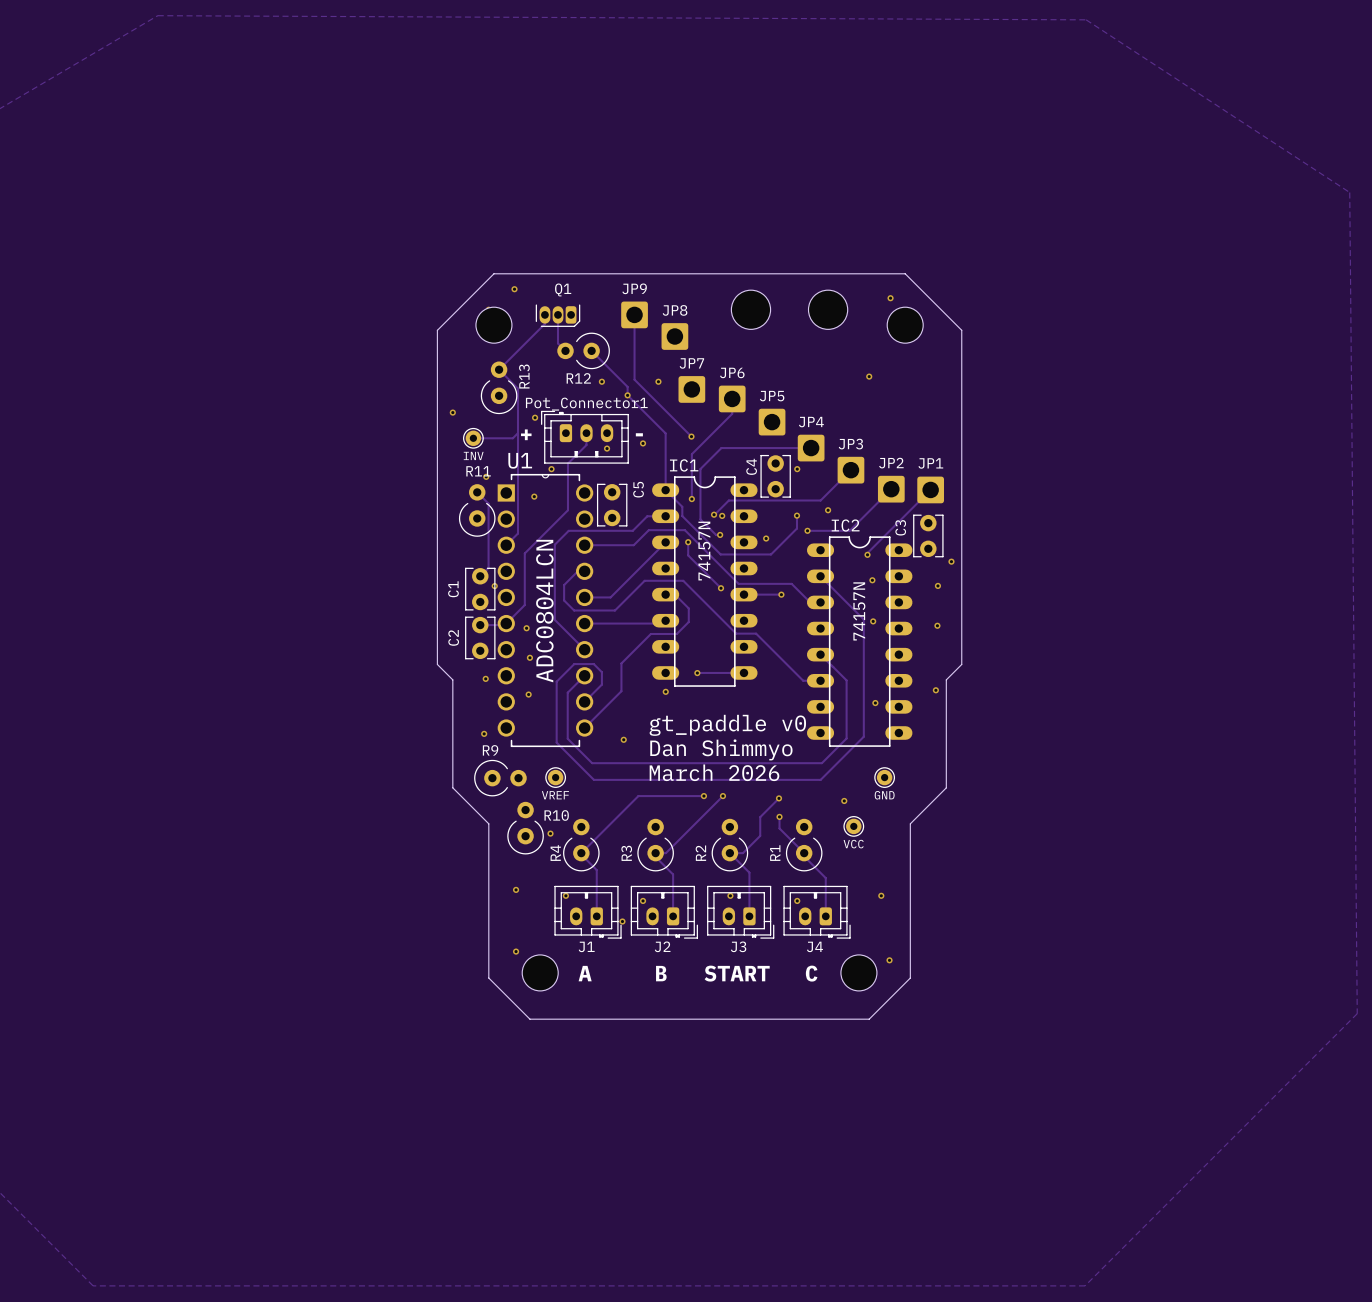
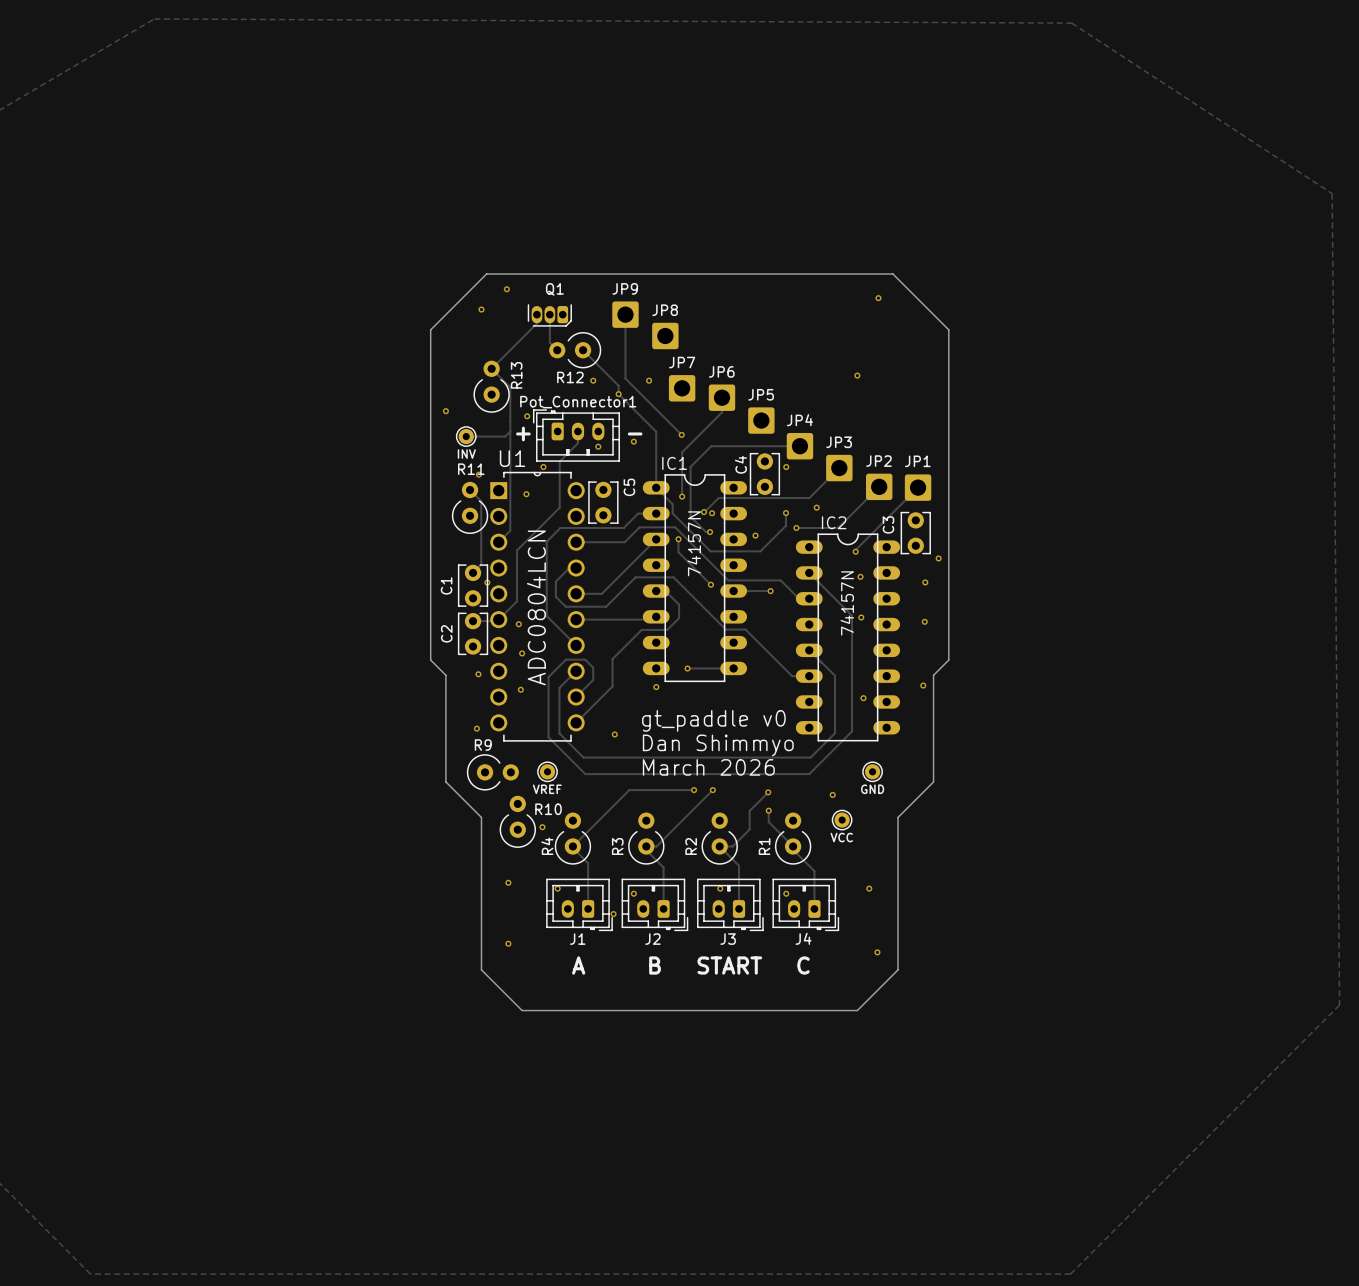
part: (750, 309) -> none
part: (828, 309) -> none
part: (493, 325) -> none
part: (905, 325) -> none
part: (540, 972) -> none
part: (858, 972) -> none

